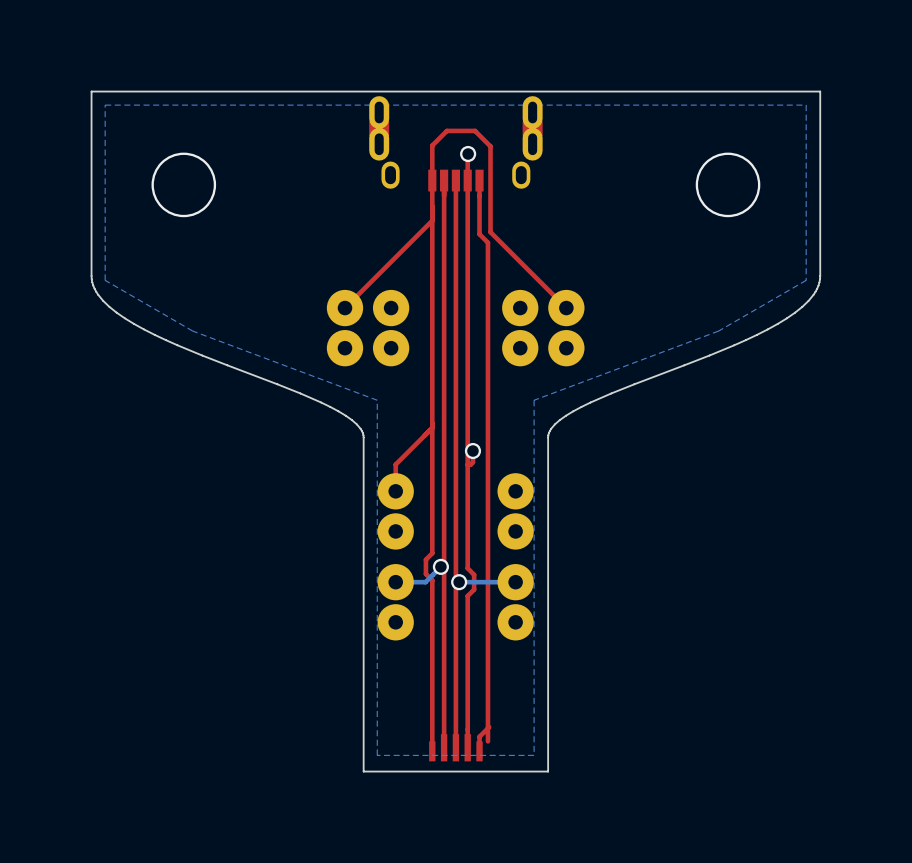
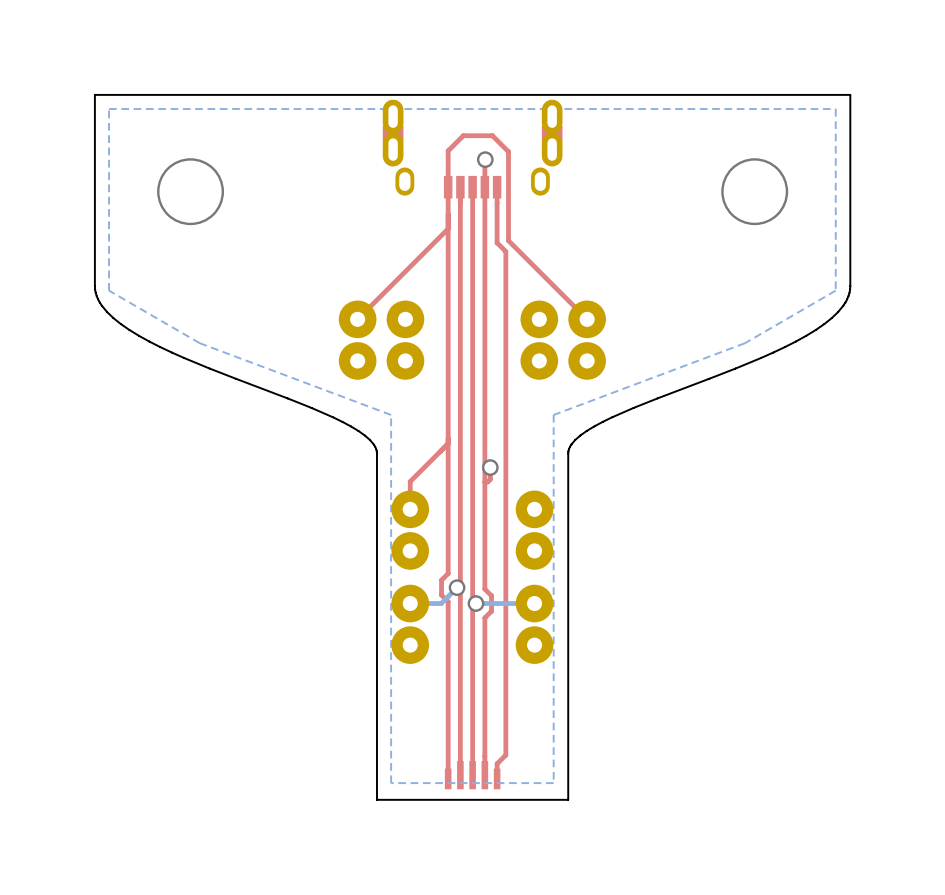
top track: (489, 727) (487, 741) -> none

